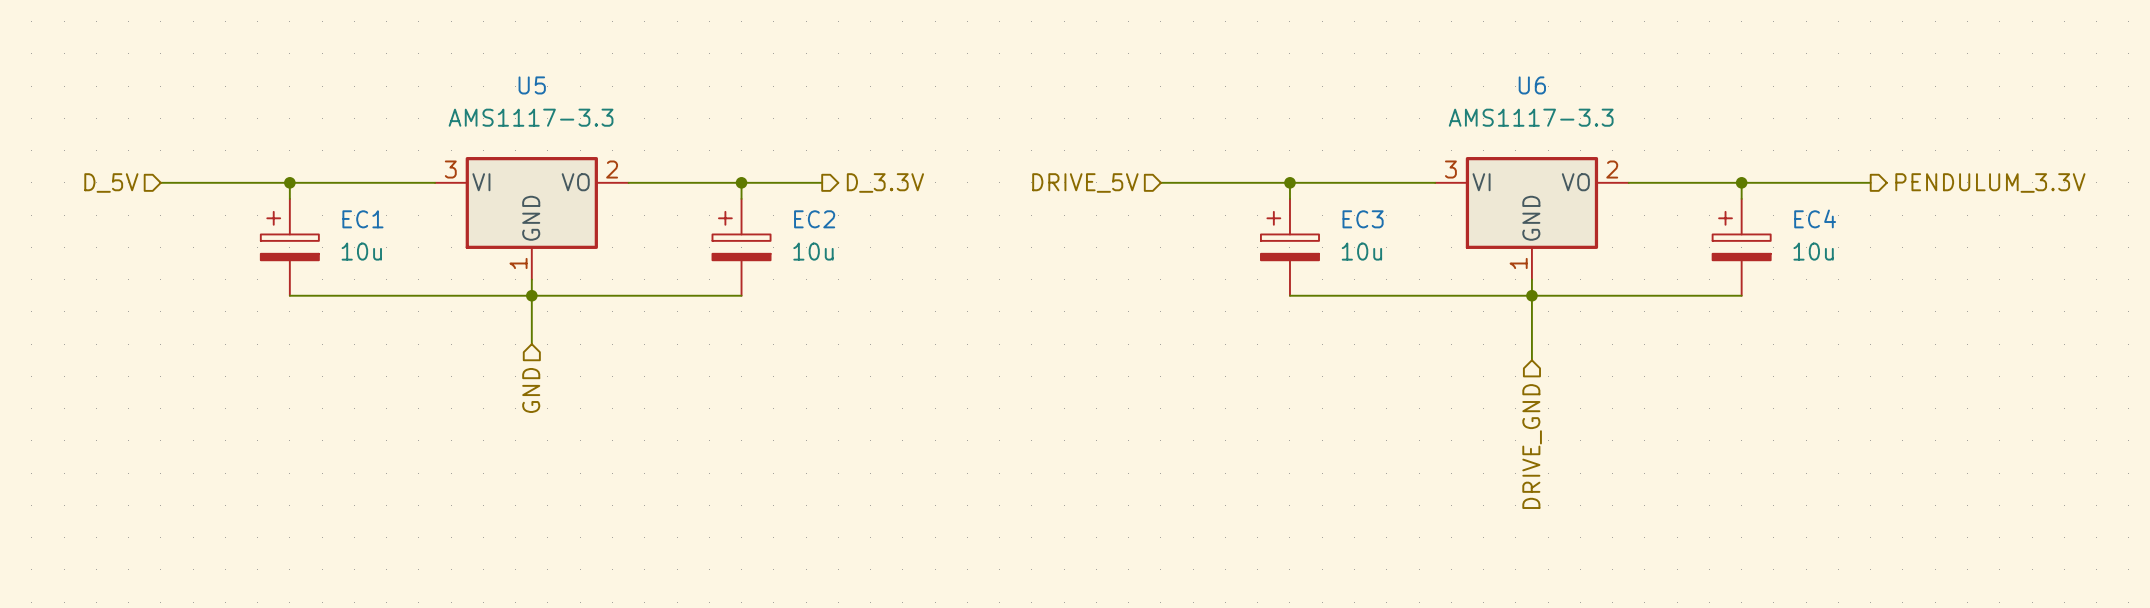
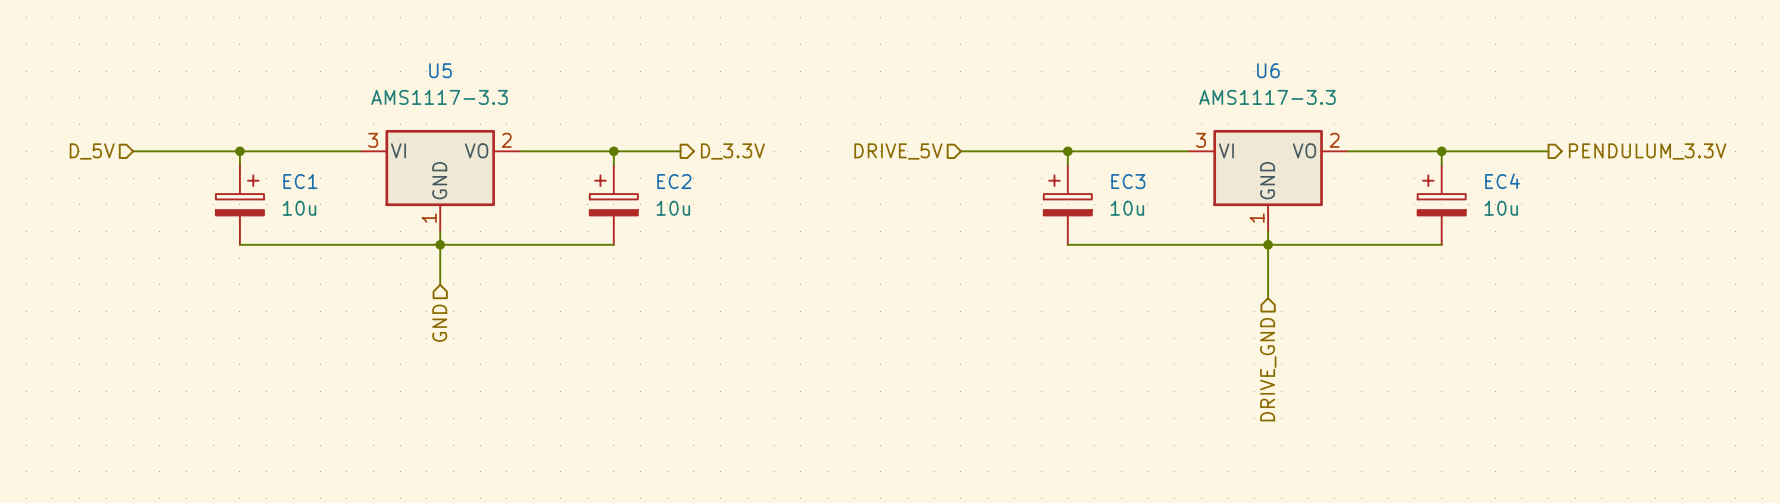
EC1 flip: as is (289, 236) -> left-right (239, 195)

